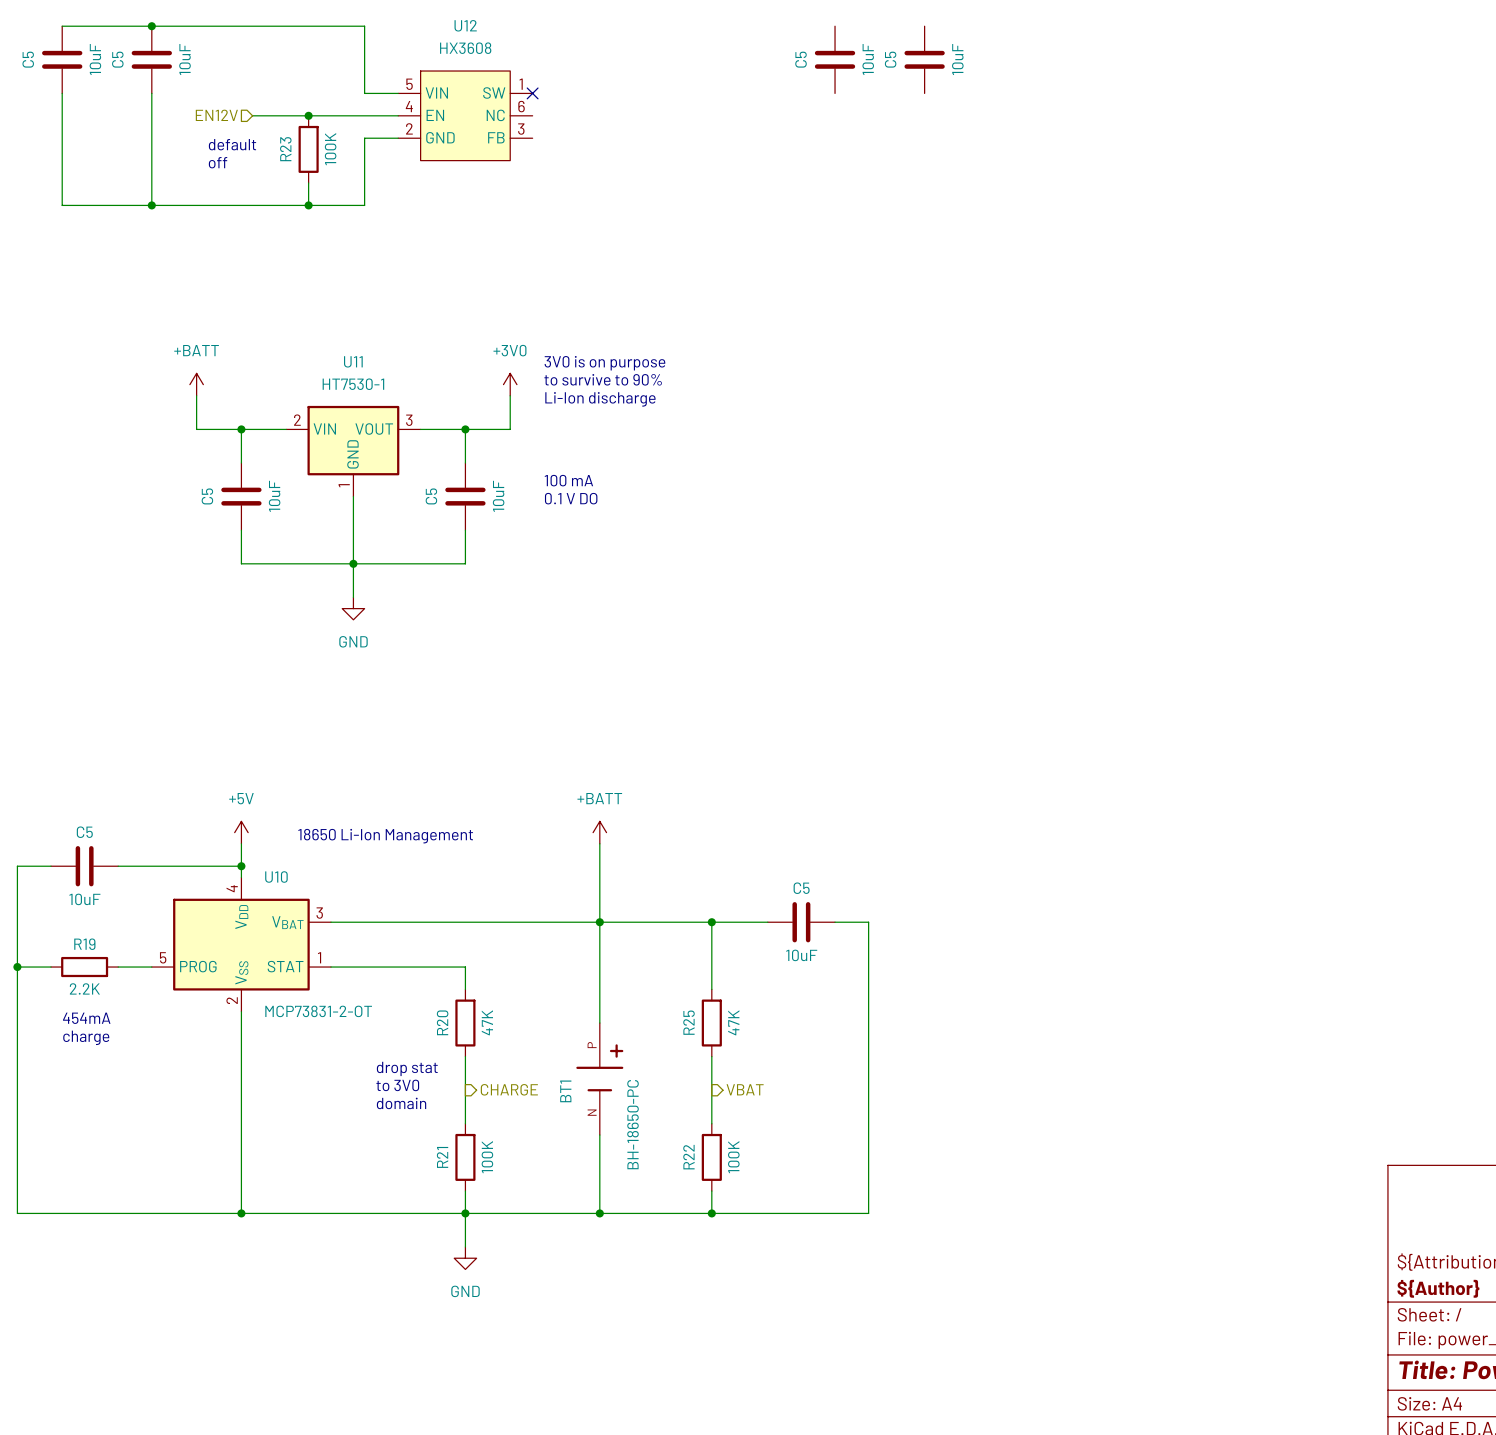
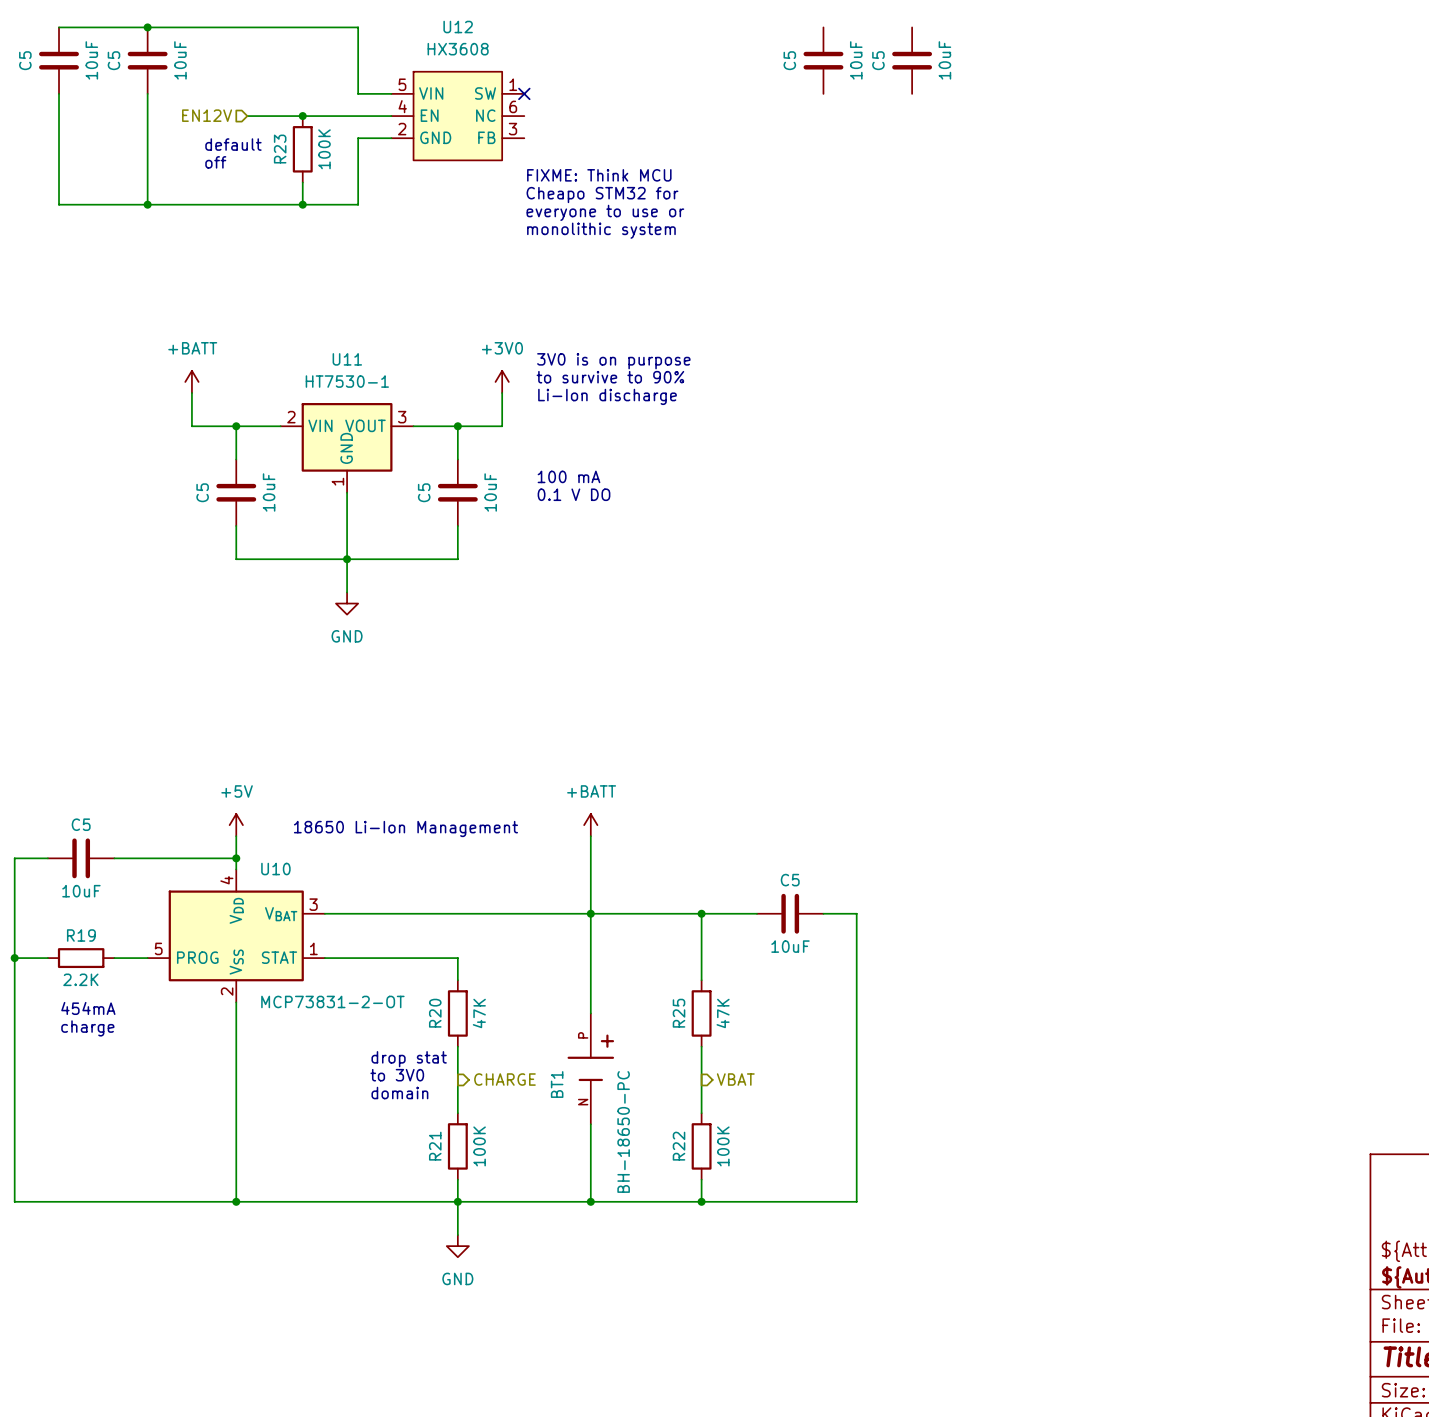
text: none -> FIXME: Think MCU (599, 175)
text: none -> Cheapo STM32 for (602, 195)
text: none -> everyone to use or (605, 212)
text: none -> monolithic system (601, 230)

